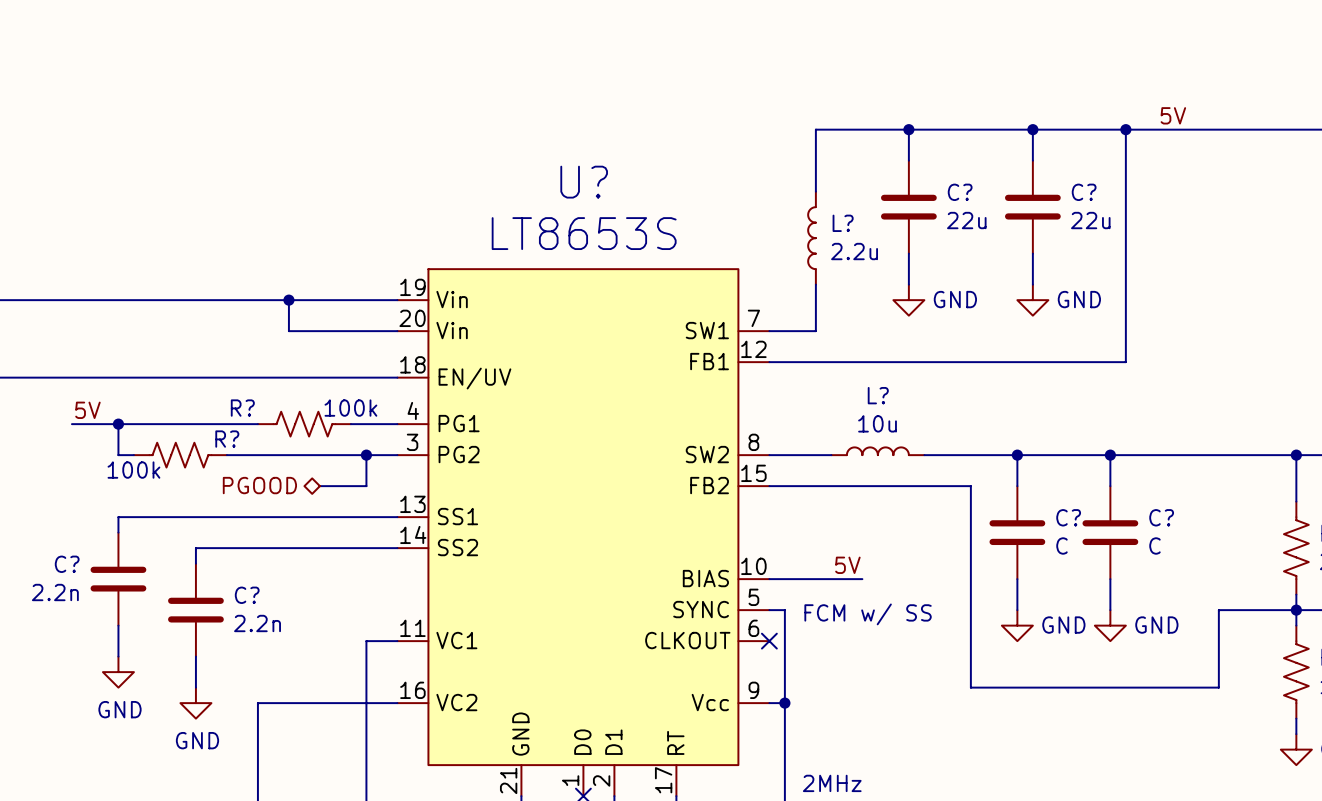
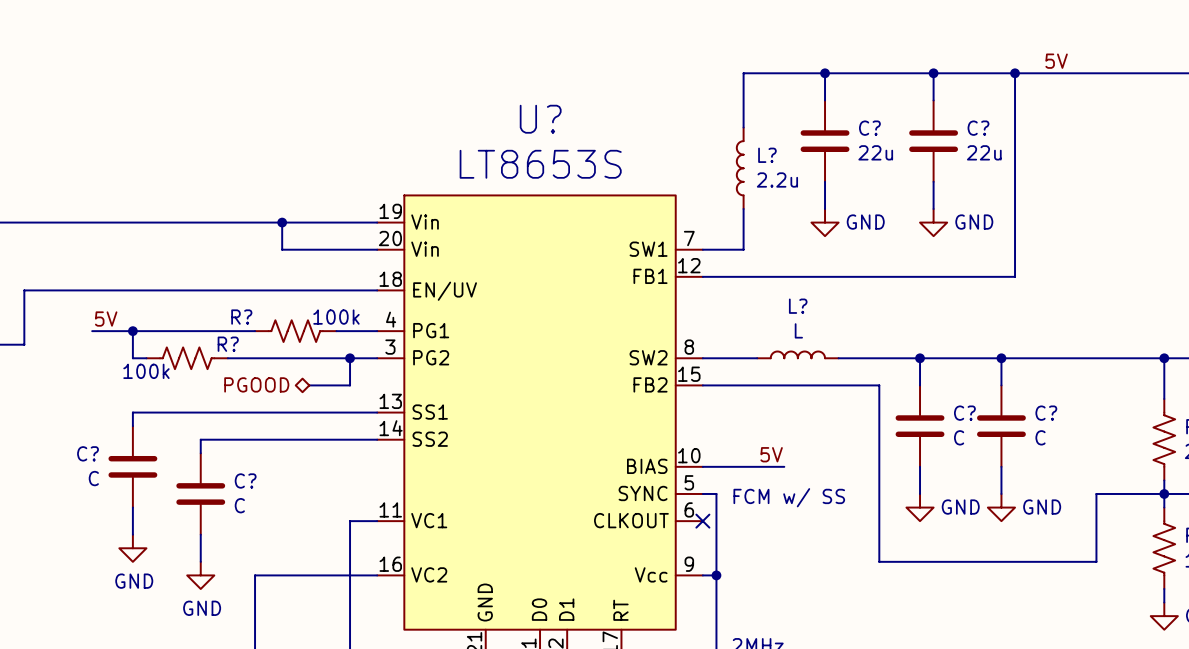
L? value: 10u (877, 423) -> L (798, 330)
C? value: 2.2n (55, 592) -> C (93, 478)
C? value: 2.2n (257, 623) -> C (239, 505)

